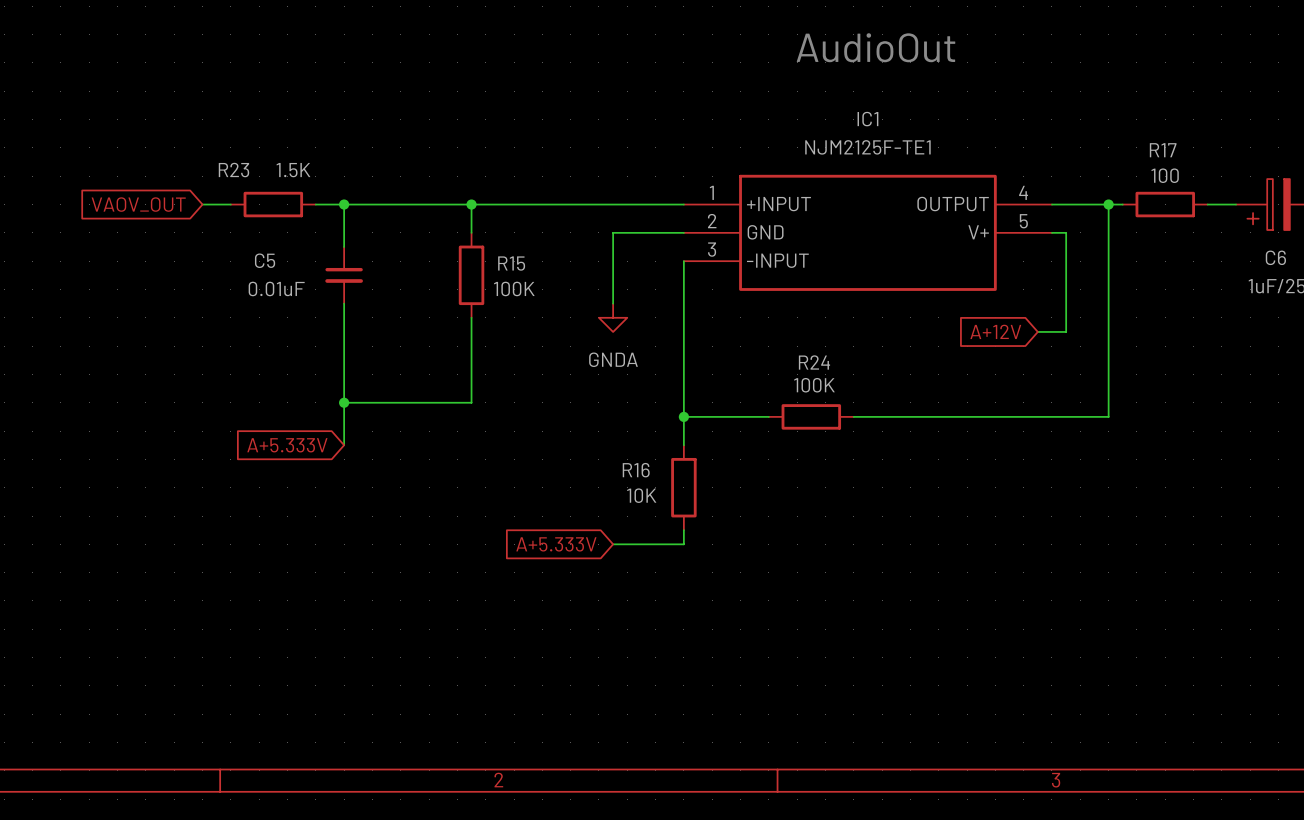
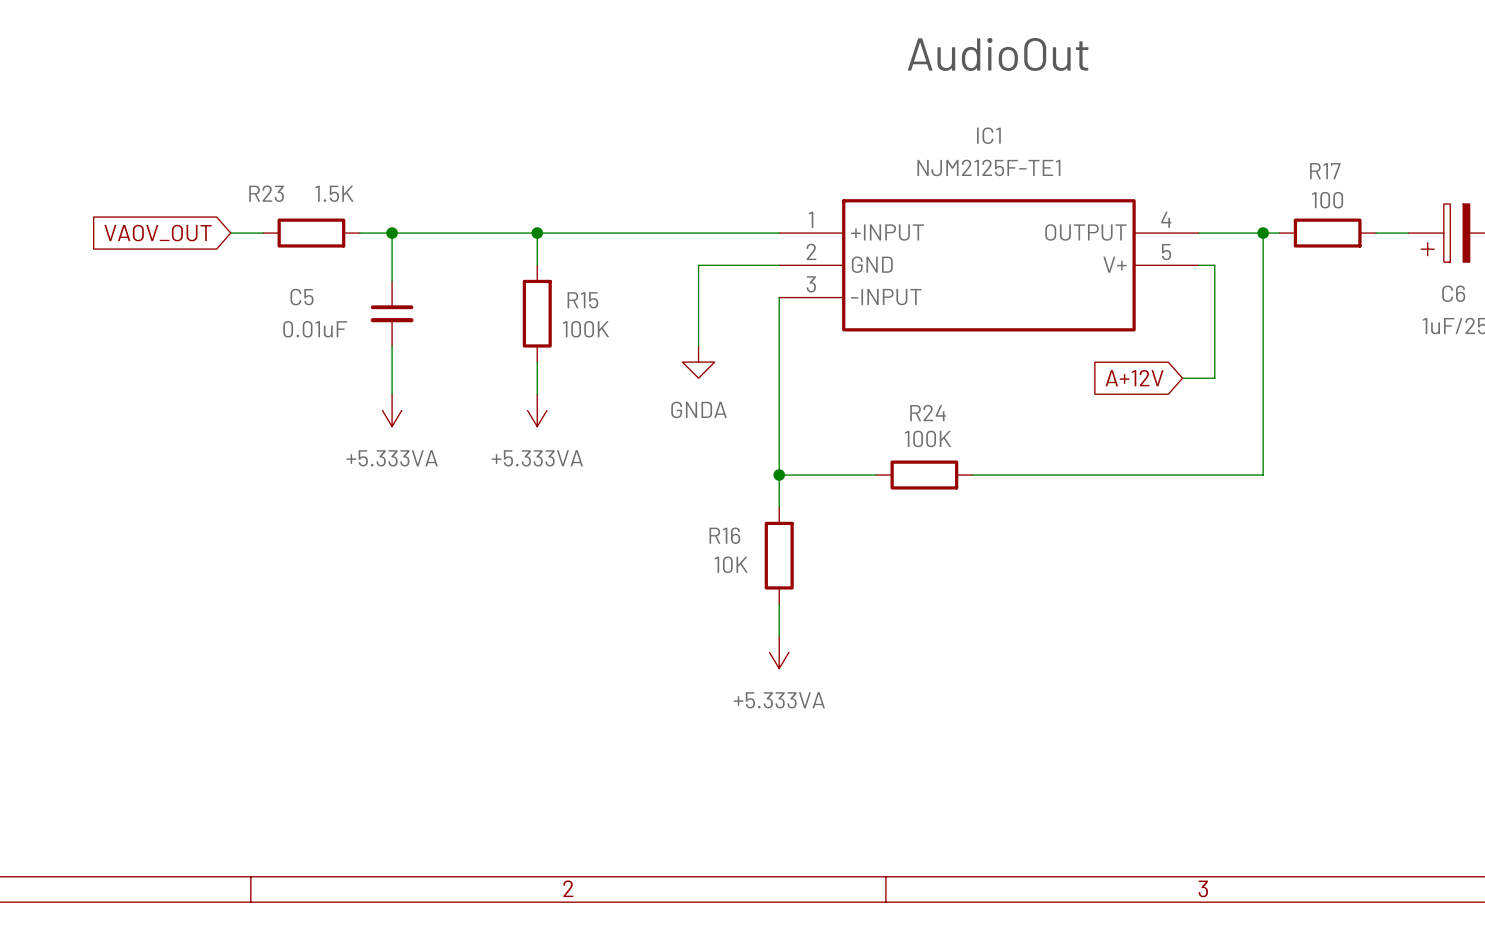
wire: (344, 346) (344, 445) -> none
wire: (471, 346) (471, 402) (344, 402) -> none
power symbol: none -> +5.333VA (392, 410)
power symbol: none -> +5.333VA (537, 410)
junction: (344, 402) -> none
global label: A+5.333V (287, 445) -> none
global label: A+5.333V (556, 544) -> none
wire: (613, 544) (683, 544) -> (779, 636) (779, 620)
power symbol: none -> +5.333VA (779, 652)

